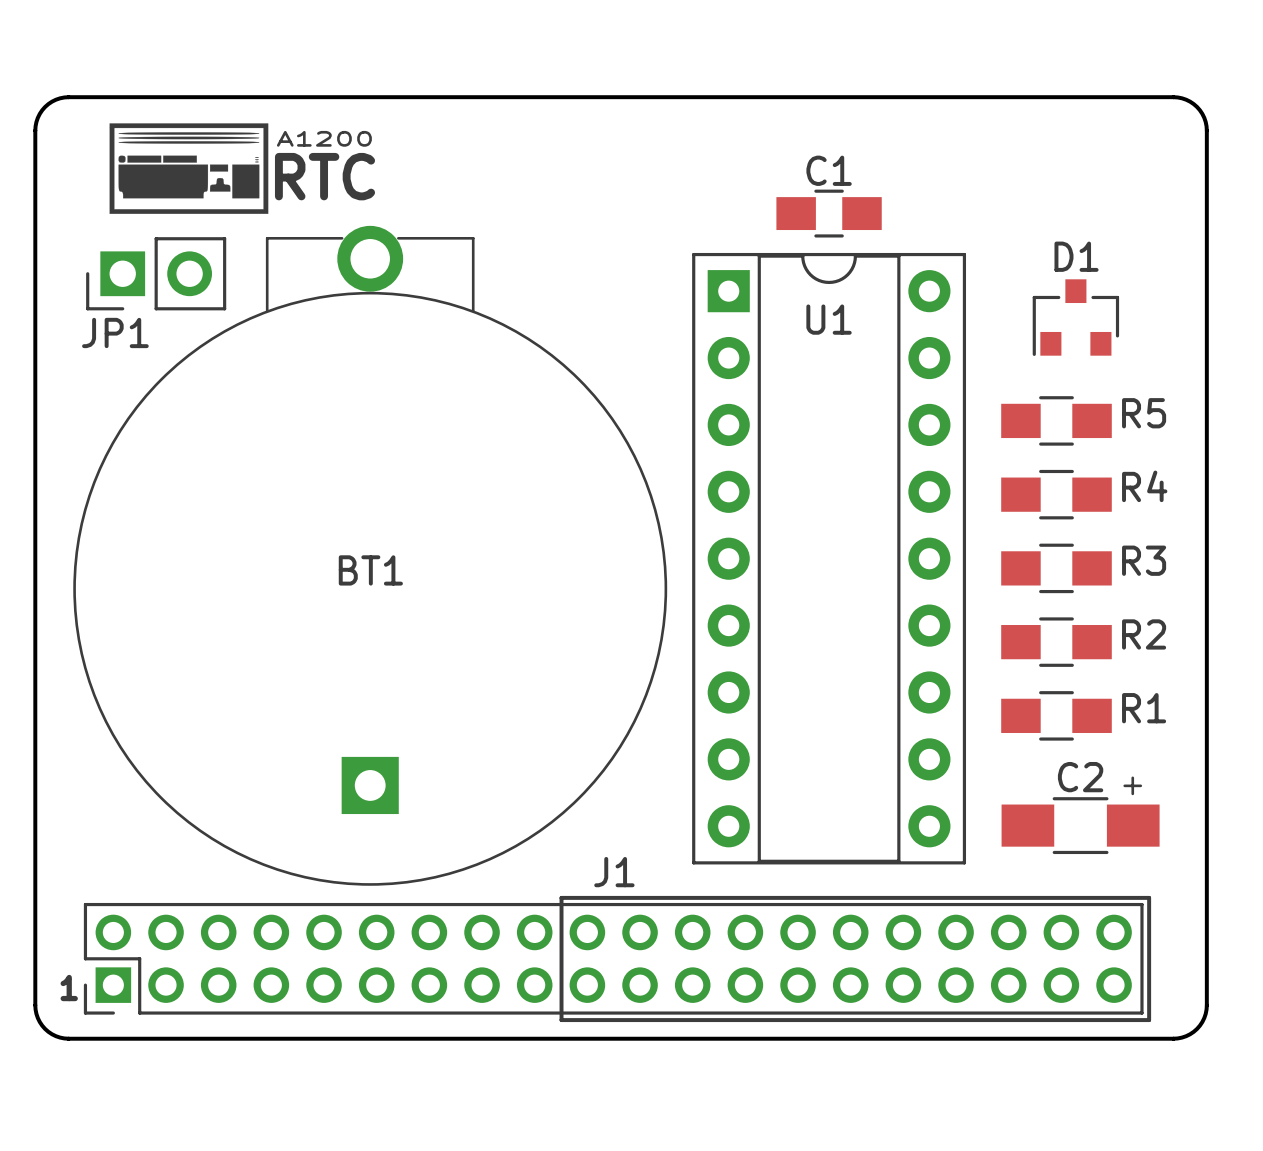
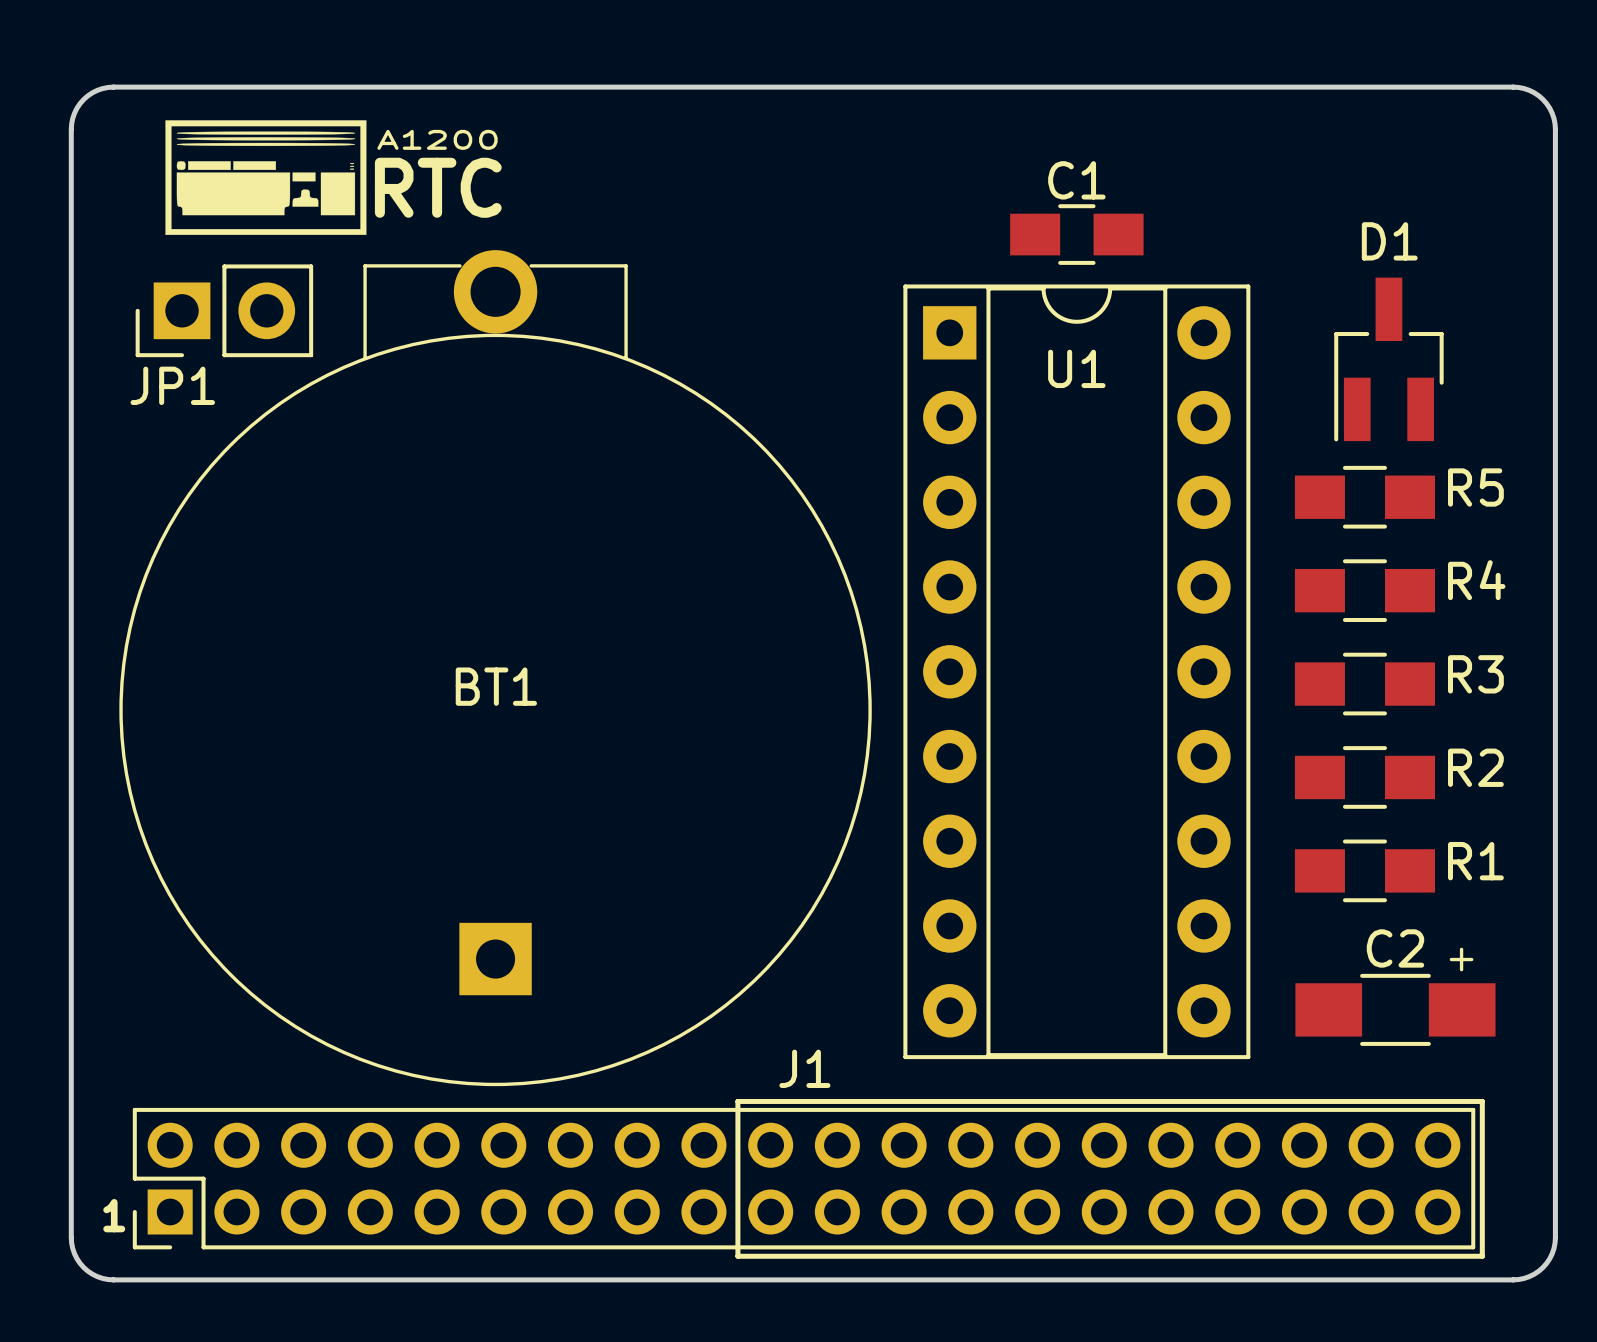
D1 footprint: [1032, 279, 1120, 356] -> [1334, 277, 1444, 442]

